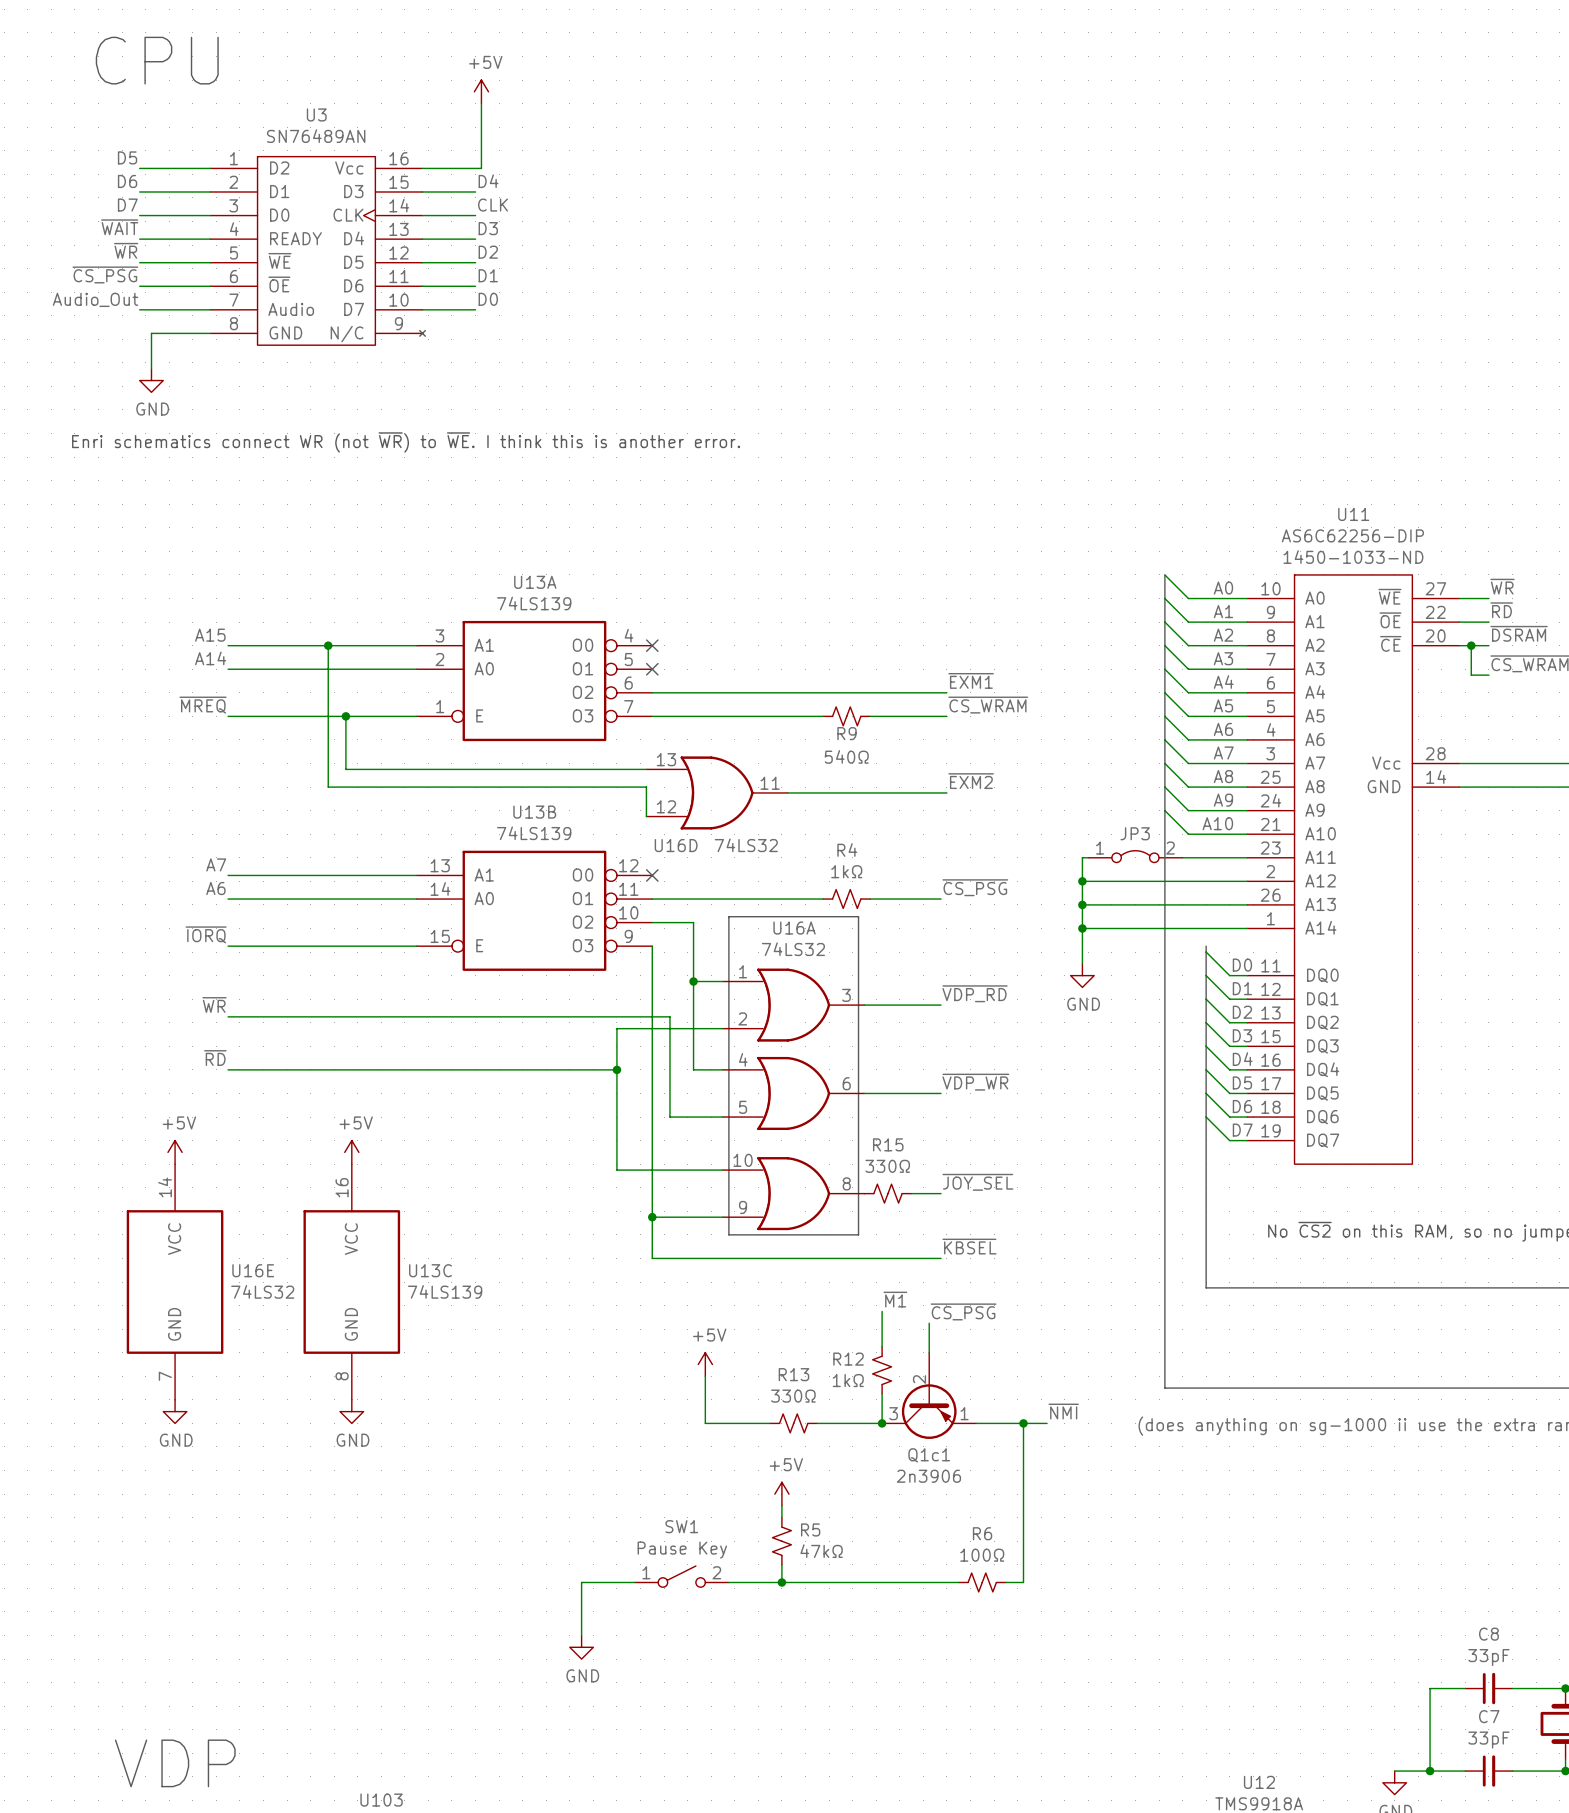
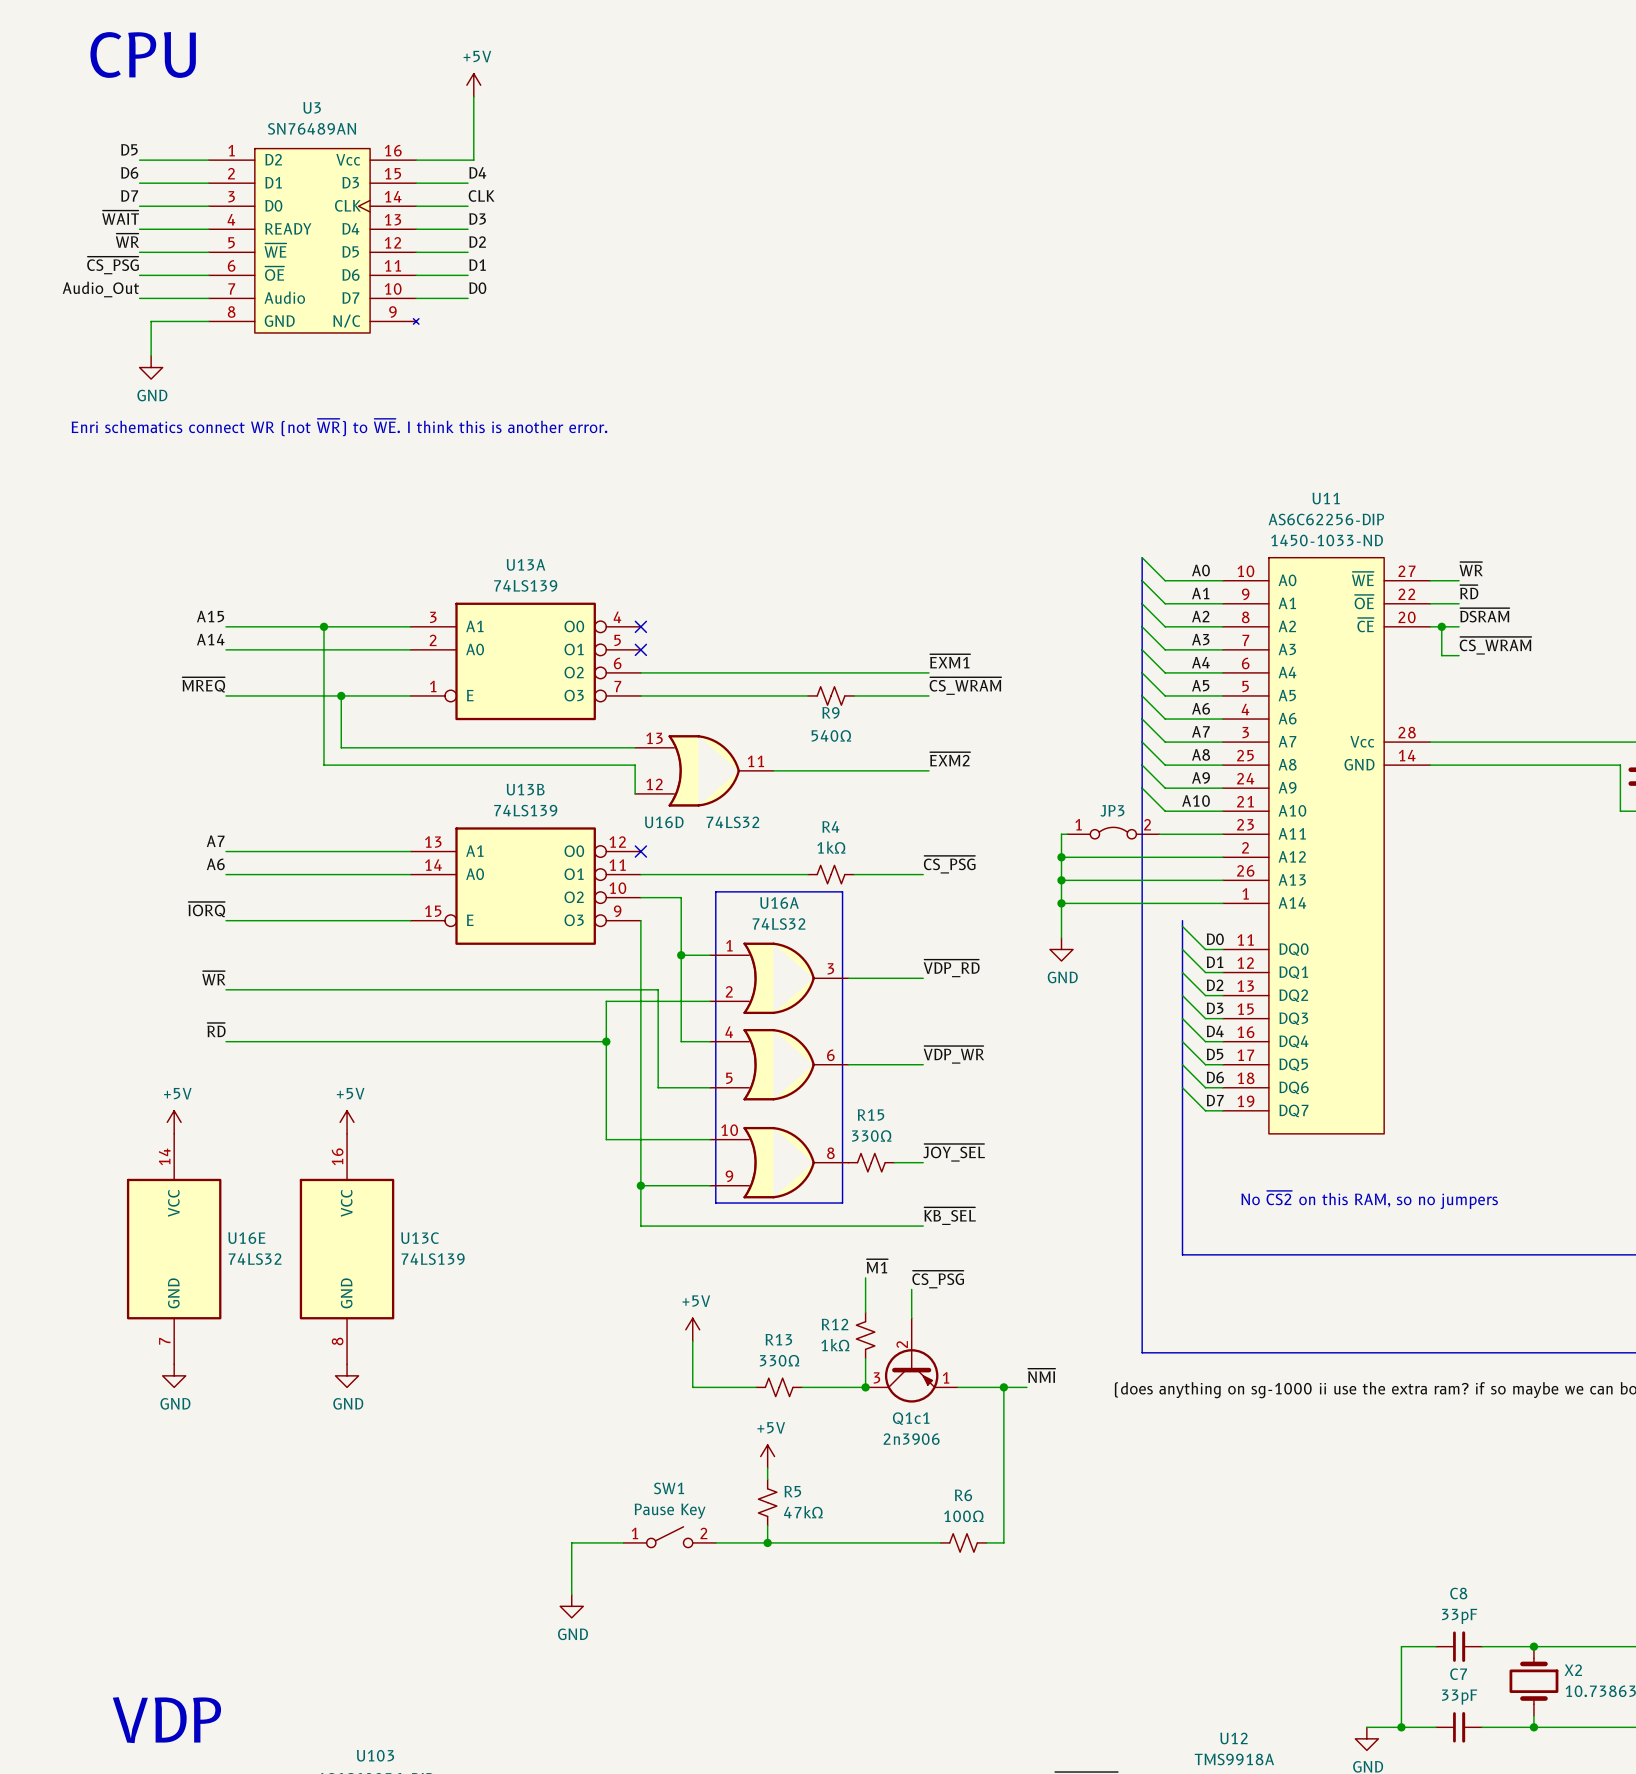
label: ~{KBSEL} (969, 1246) -> ~{KB_SEL} (950, 1216)

